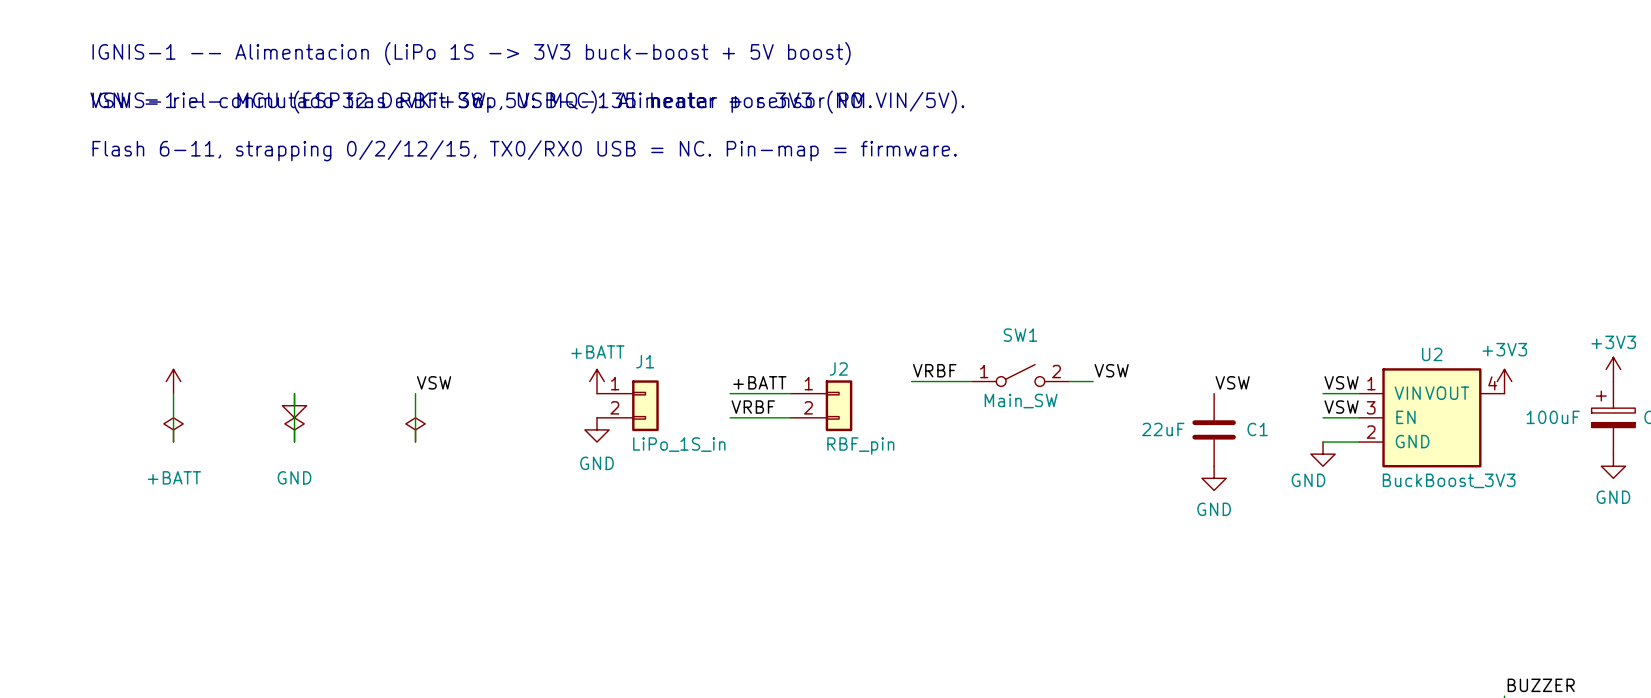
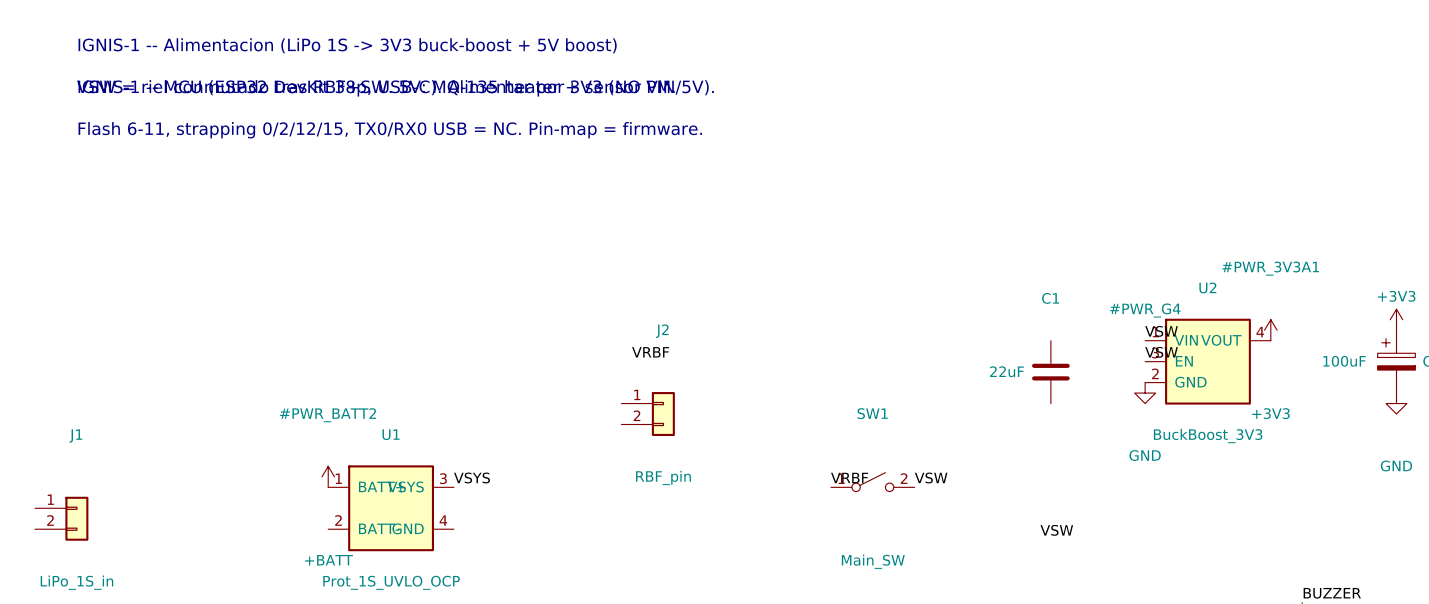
SW1 name position: SW1 (1020, 335) -> SW1 (872, 413)
U2 name position: U2 (1432, 354) -> U2 (1207, 287)
#PWR_G4 name: none -> #PWR_G4 (1145, 310)
J1 name position: J1 (645, 361) -> J1 (75, 436)
J2 name position: J2 (838, 368) -> J2 (662, 331)
label position: VRBF (934, 370) -> VRBF (849, 477)
label: VSW (1111, 370) -> none
SW1 position: (1020, 375) -> (872, 482)
power symbol: +BATT (173, 381) -> none
power symbol: +BATT (597, 381) -> none
wire: (911, 381) (972, 381) -> none
wire: (1068, 381) (1093, 381) -> none
#PWR_3V3A1: none -> +3V3 (1270, 330)
power symbol: +3V3 (1504, 381) -> none
label: VSW (434, 382) -> none
label: +BATT (759, 382) -> none
label: VSW (1232, 382) -> none
wire: (173, 393) (173, 442) -> none
wire: (294, 393) (294, 442) -> none
wire: (415, 393) (415, 442) -> none
wire: (730, 393) (790, 393) -> none
SW1 value position: Main_SW (1021, 401) -> Main_SW (873, 561)
power symbol: GND (294, 405) -> none
J1 position: (627, 405) -> (61, 518)
J2 position: (821, 405) -> (648, 414)
wire: (730, 417) (790, 417) -> none
U2 position: (1431, 417) -> (1207, 361)
power symbol: (173, 429) -> none
power symbol: (294, 429) -> none
power symbol: (415, 429) -> none
power symbol: GND (597, 429) -> none
C1 name position: C1 (1257, 429) -> C1 (1050, 298)
J1 value position: LiPo_1S_in (679, 444) -> LiPo_1S_in (76, 582)
J2 value position: RBF_pin (860, 446) -> RBF_pin (663, 477)
power symbol: GND (1214, 478) -> none
#PWR_G4 text position: GND (1308, 480) -> GND (1145, 455)
U2 value position: BuckBoost_3V3 (1449, 480) -> BuckBoost_3V3 (1208, 436)
power symbol text position: GND (1613, 497) -> GND (1396, 466)
#PWR_BATT2: none -> +BATT (328, 476)
label: none -> VSYS (471, 477)
label: none -> VSW (931, 477)
U1: none -> Prot_1S_UVLO_OCP (391, 508)
label: none -> VSW (1056, 530)

